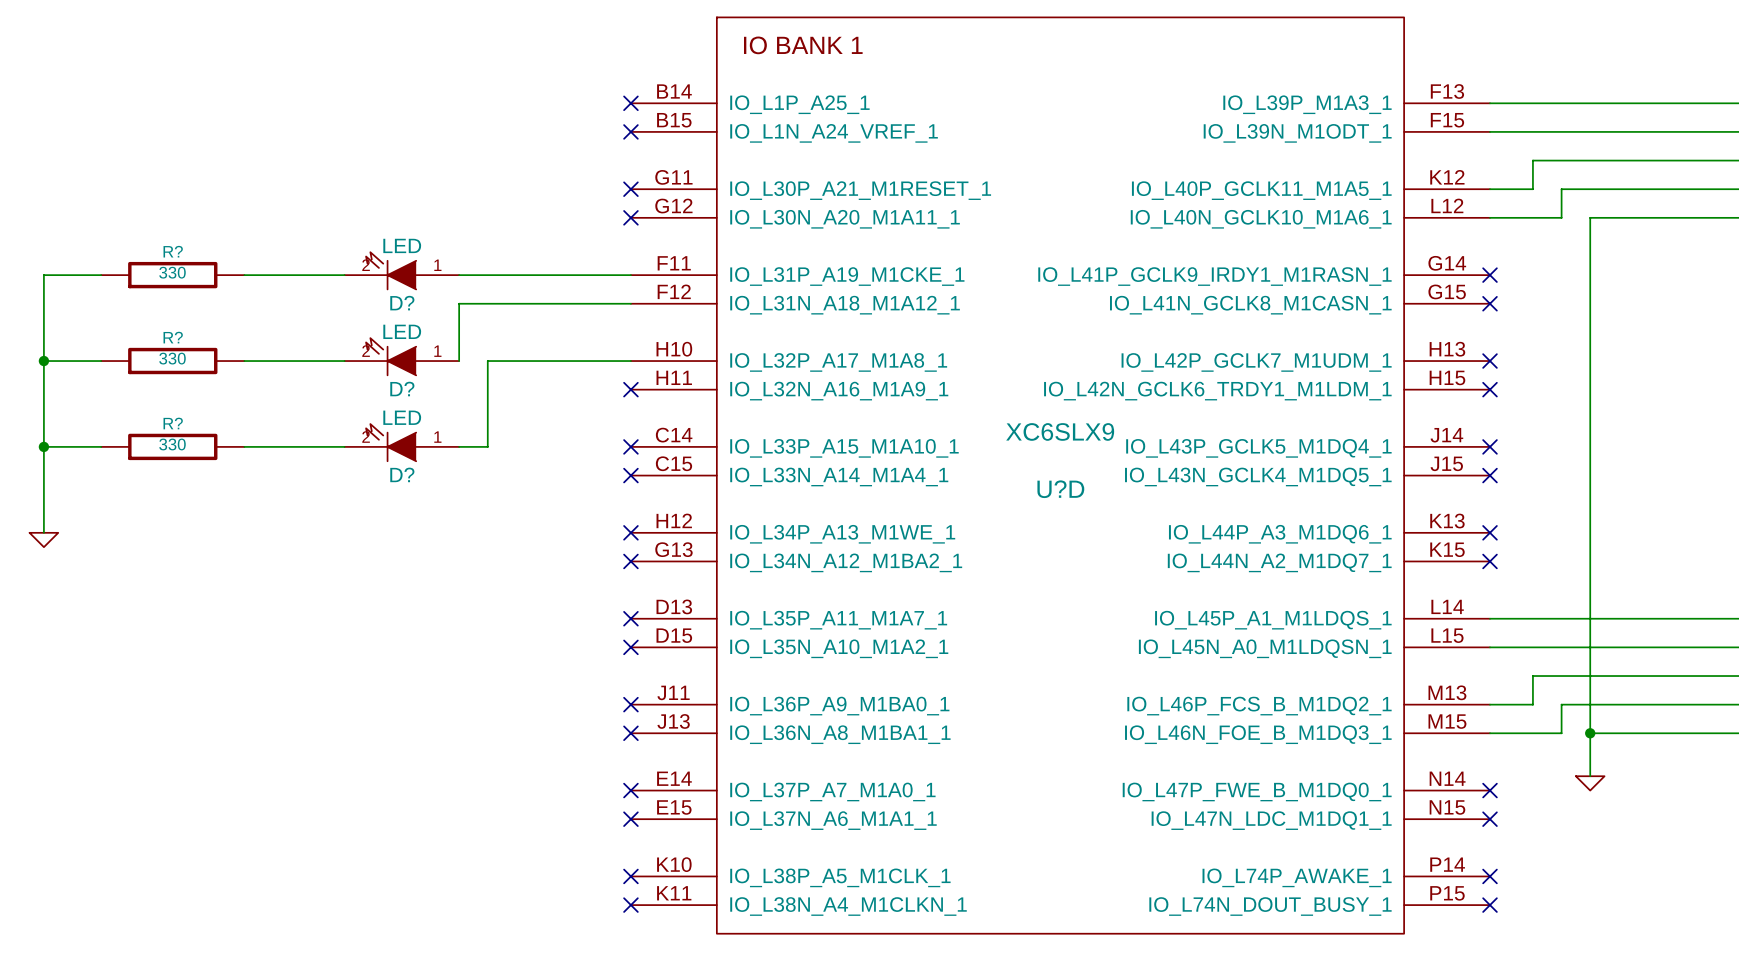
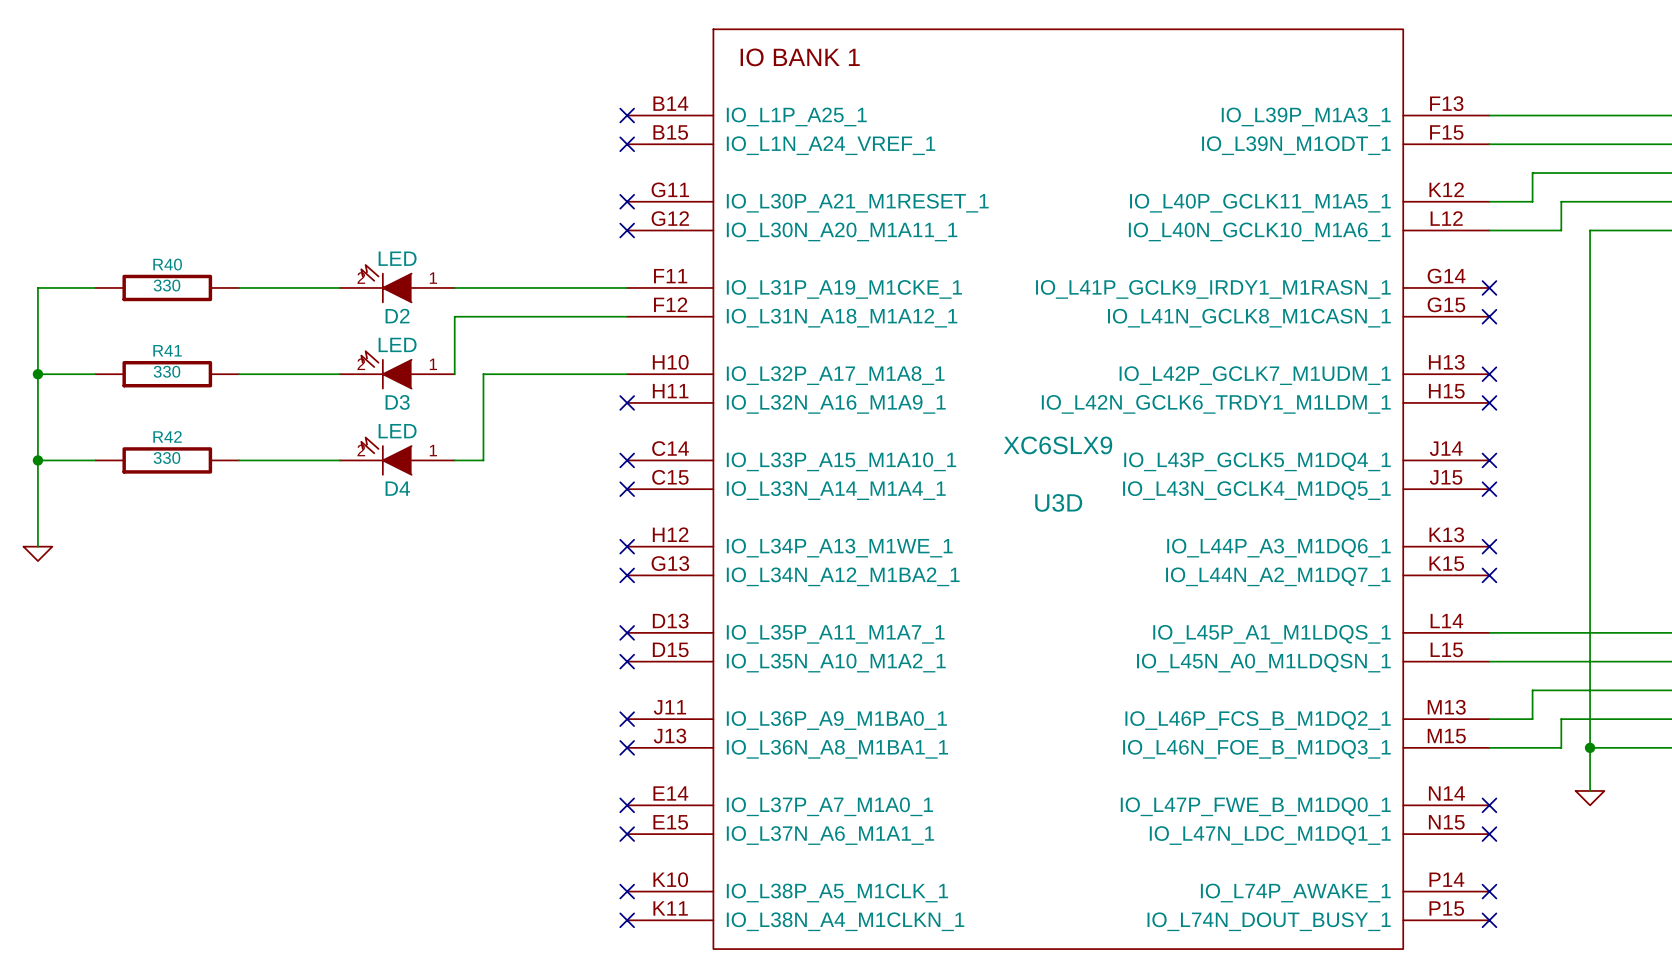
R? name: R? (173, 251) -> R40 (167, 264)
D? name: D? (402, 303) -> D2 (397, 316)
R? name: R? (173, 337) -> R41 (167, 350)
D? name: D? (402, 389) -> D3 (397, 402)
R? name: R? (173, 423) -> R42 (167, 436)
D? name: D? (402, 474) -> D4 (397, 488)
U?D name: U?D (1060, 489) -> U3D (1058, 502)

